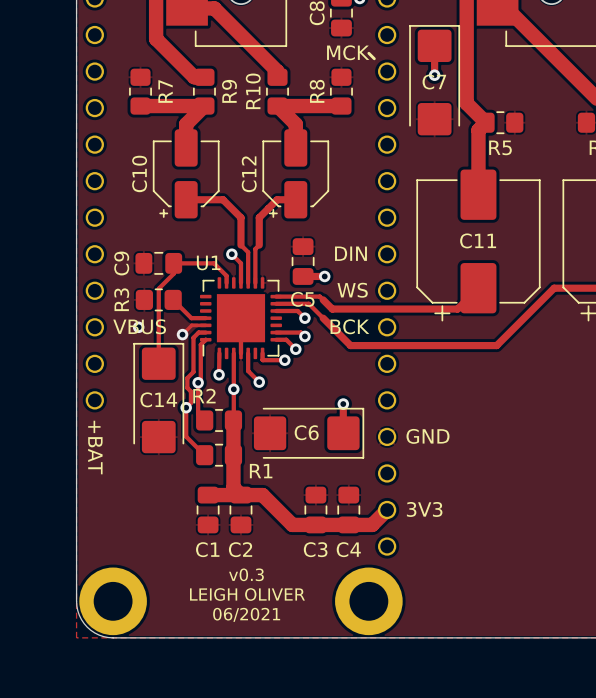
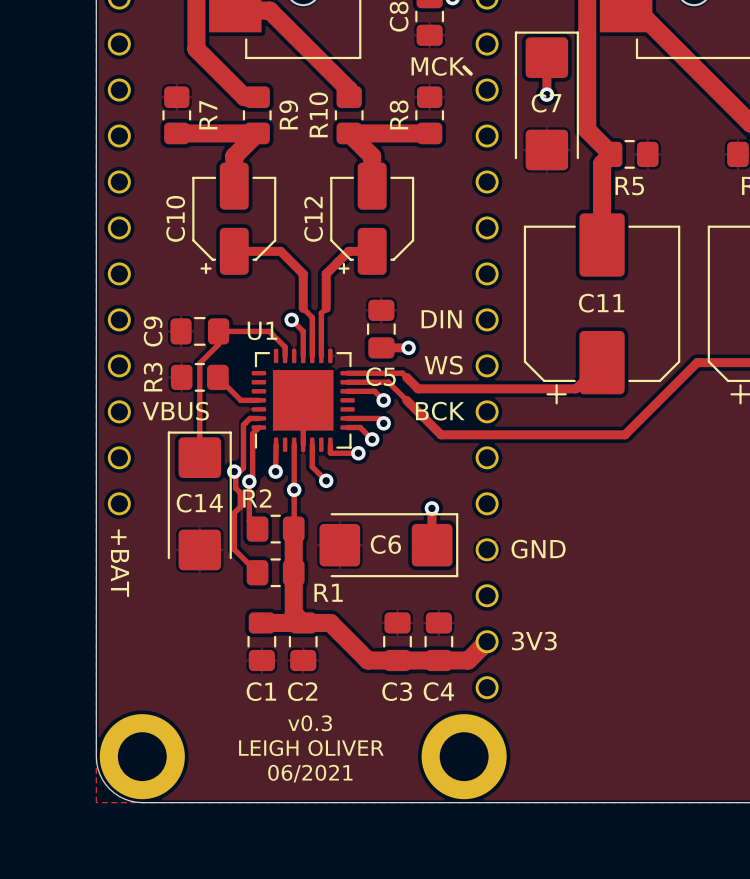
track: (205, 325) (191, 325) (182, 334) -> none
via: (138, 327) -> none
via: (182, 334) -> none
via: none -> (234, 471)
via: (186, 407) -> none

